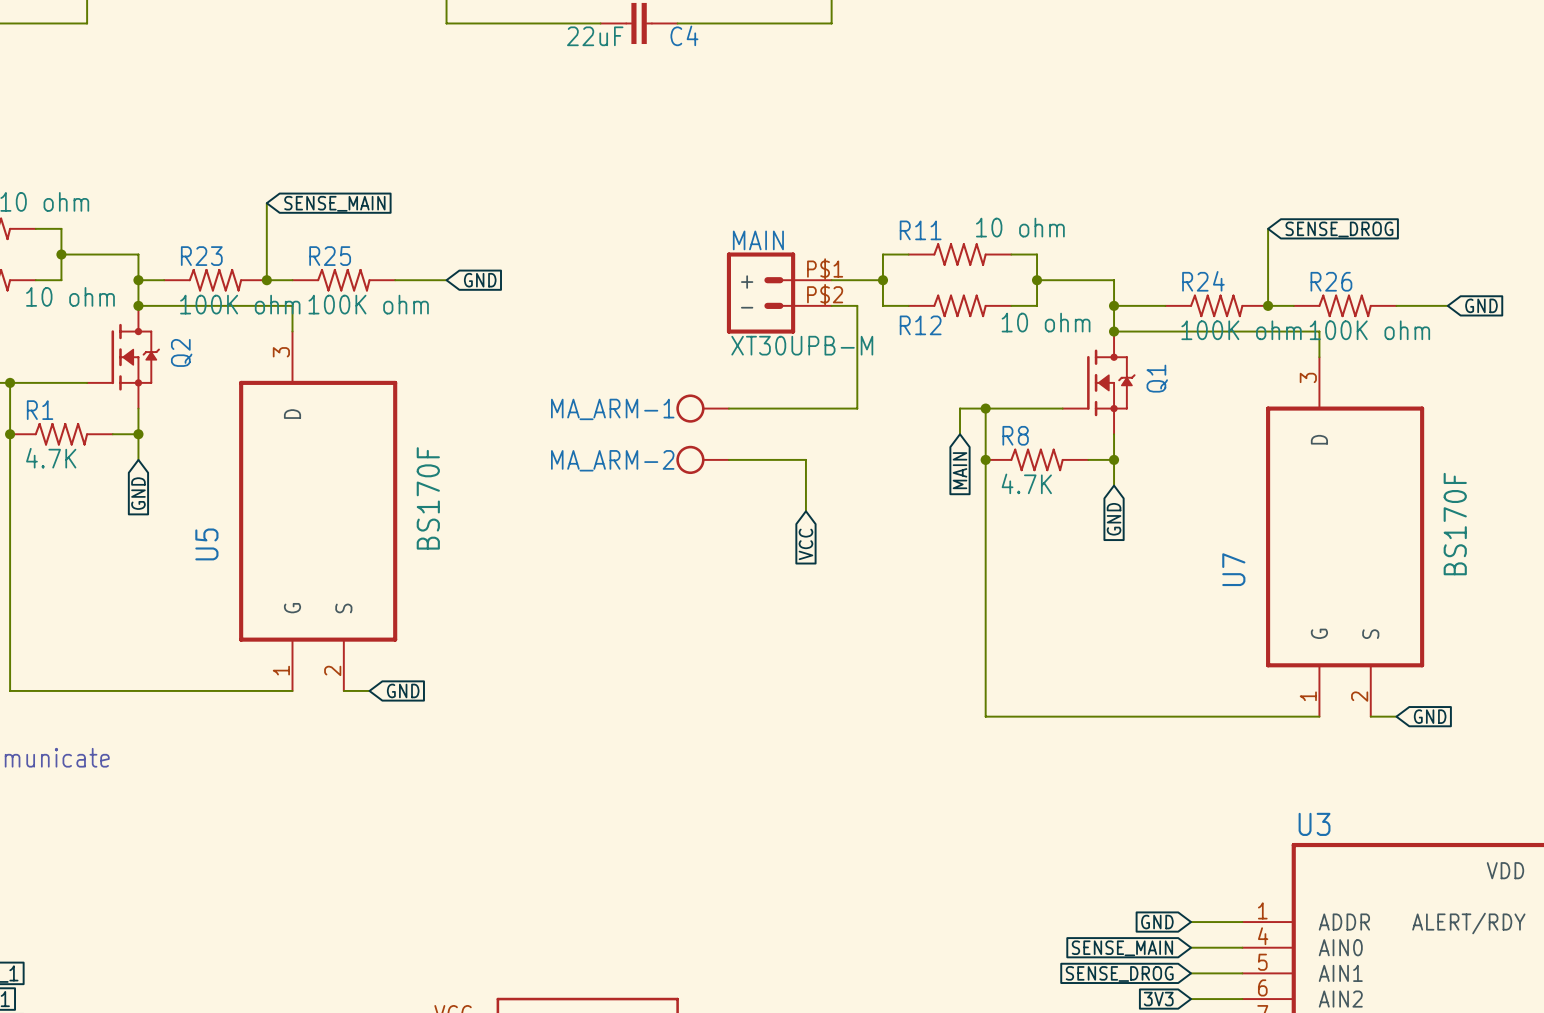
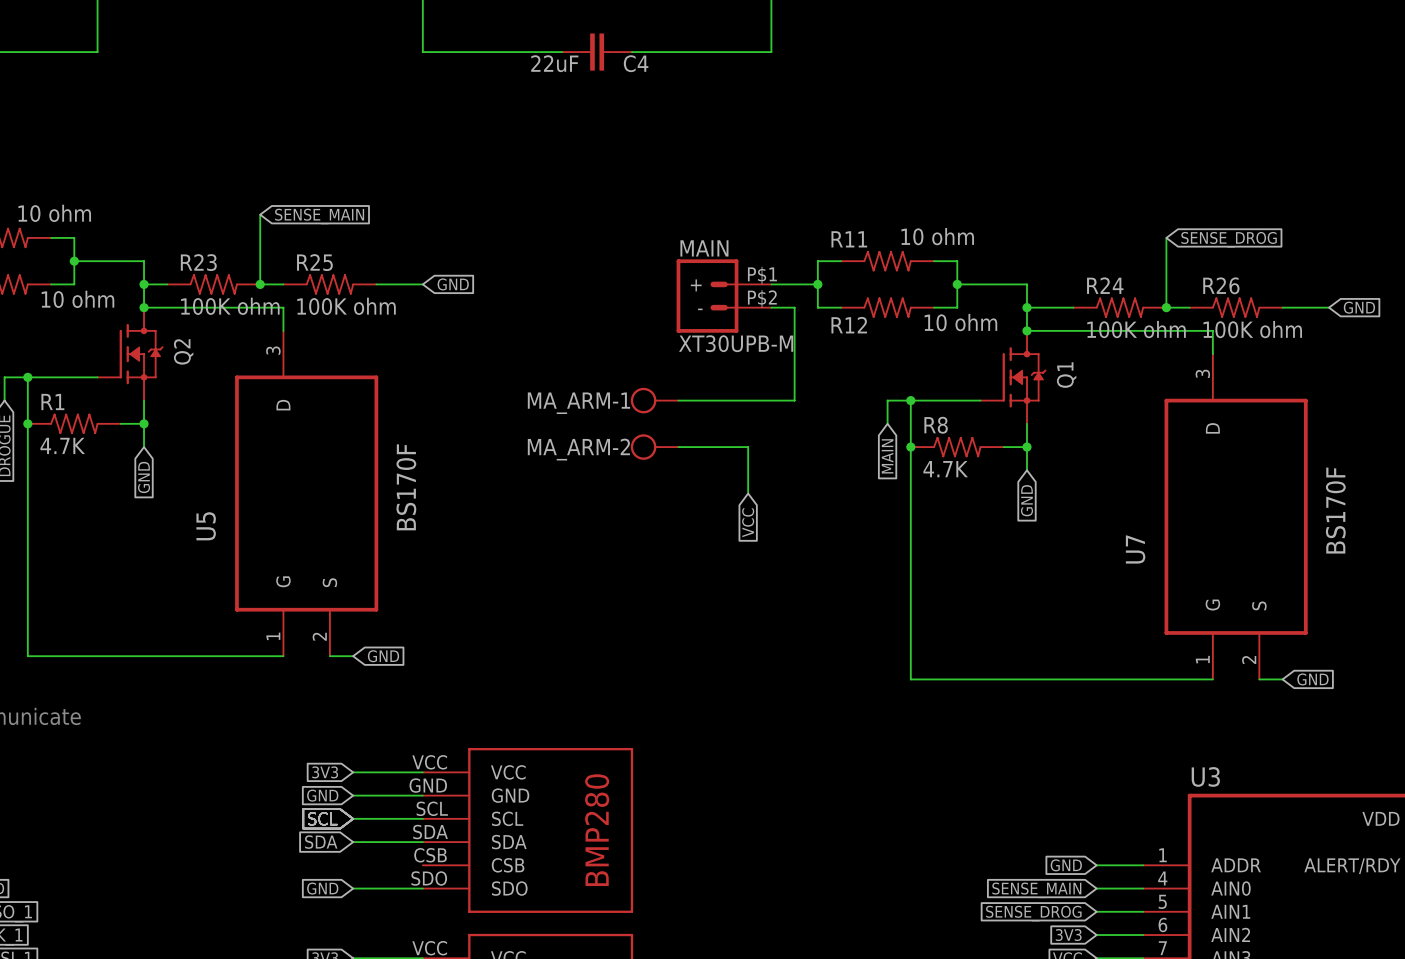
global label: none -> 3V3 (325, 772)
wire: none -> (353, 772) (422, 772)
global label: none -> GND (322, 795)
wire: none -> (353, 795) (422, 795)
global label: none -> SCL (322, 818)
wire: none -> (353, 818) (422, 818)
part: none -> (528, 830)
global label: none -> SDA (321, 842)
wire: none -> (353, 842) (422, 842)
global label: none -> GND (322, 888)
wire: none -> (353, 888) (422, 888)

